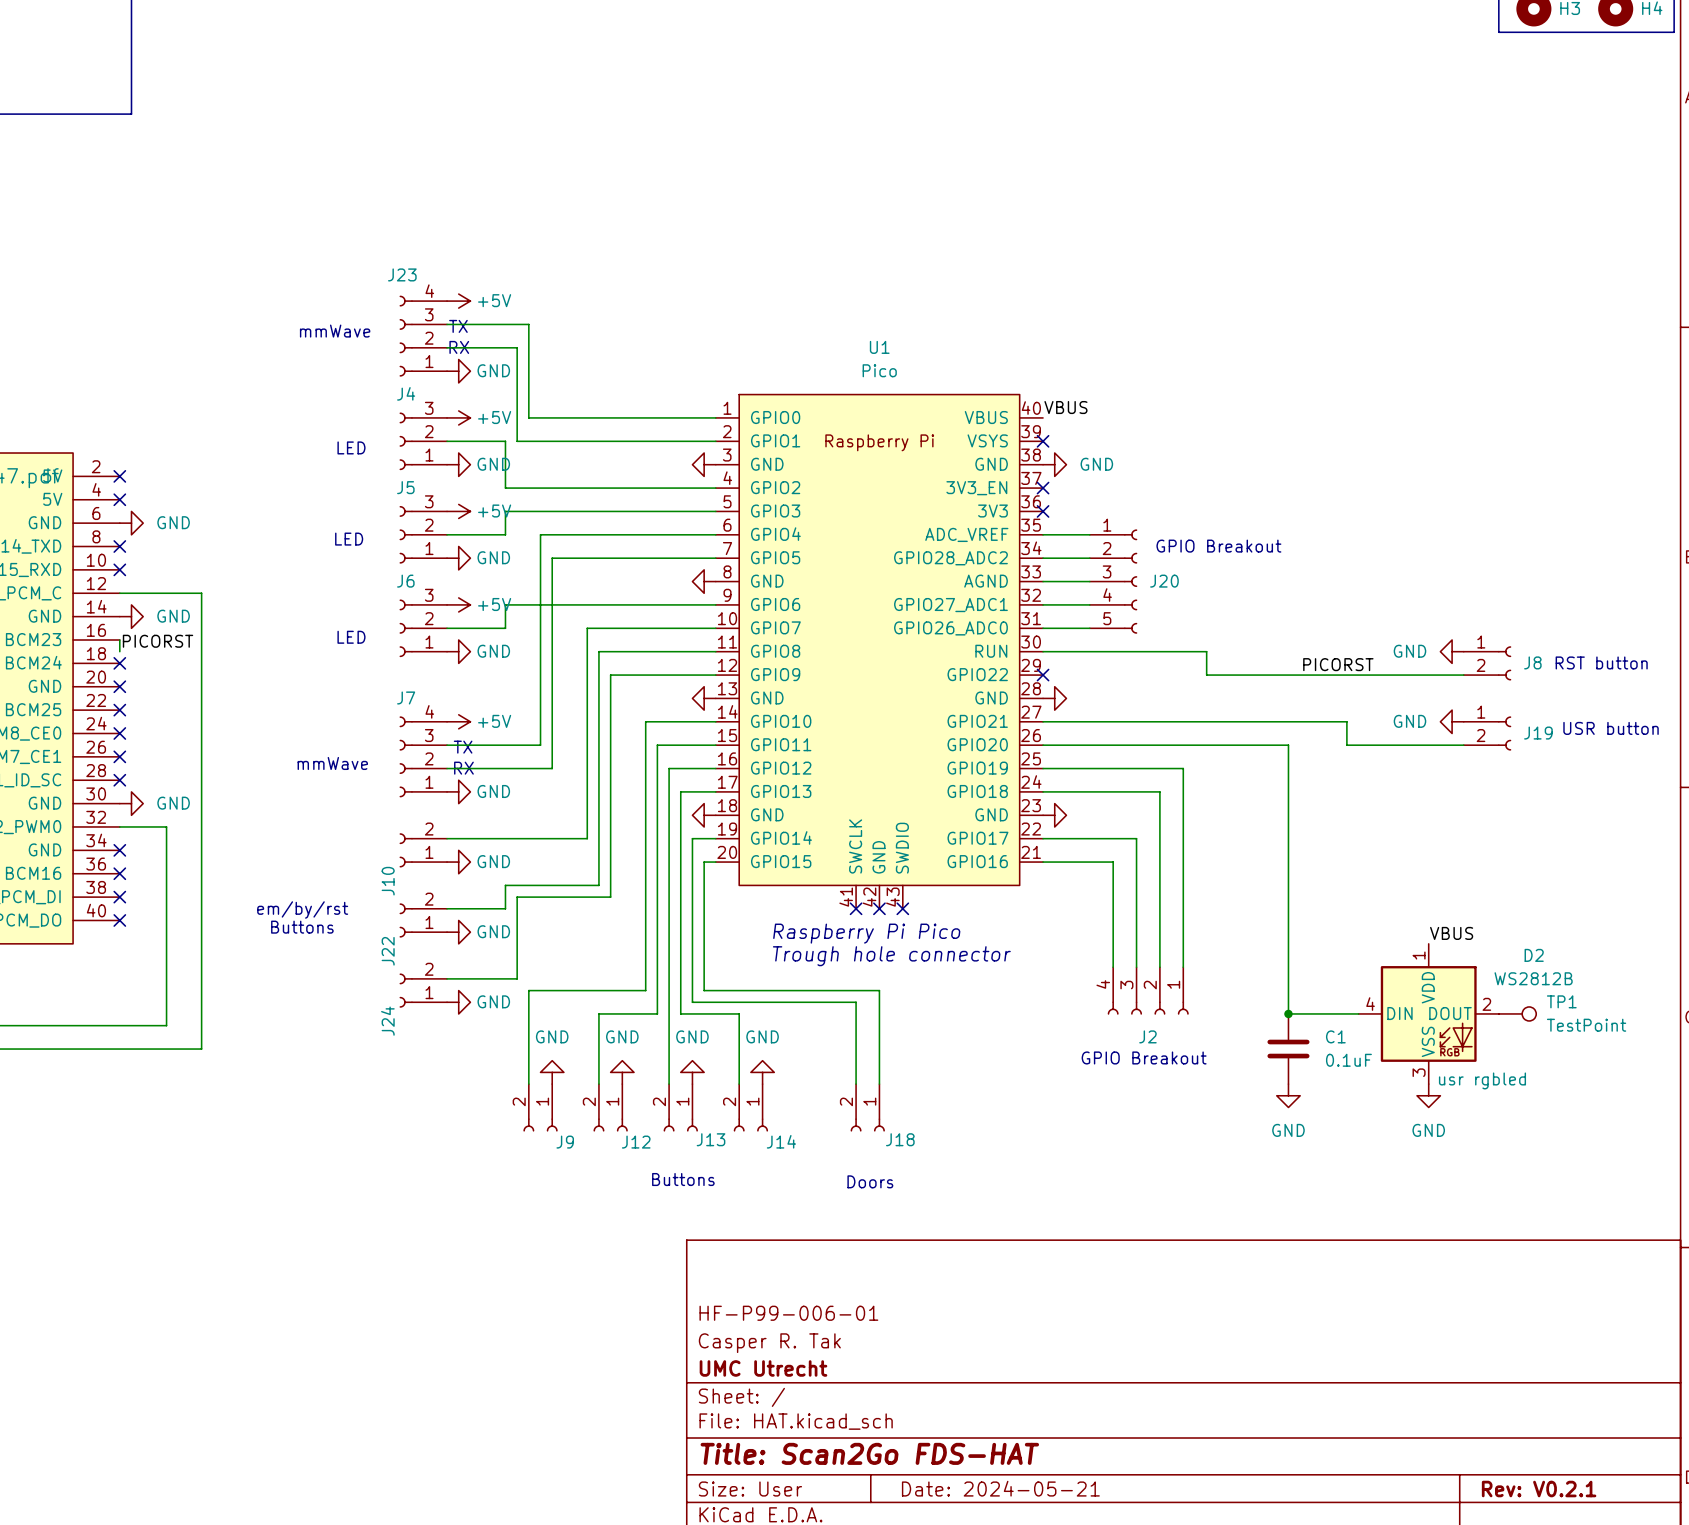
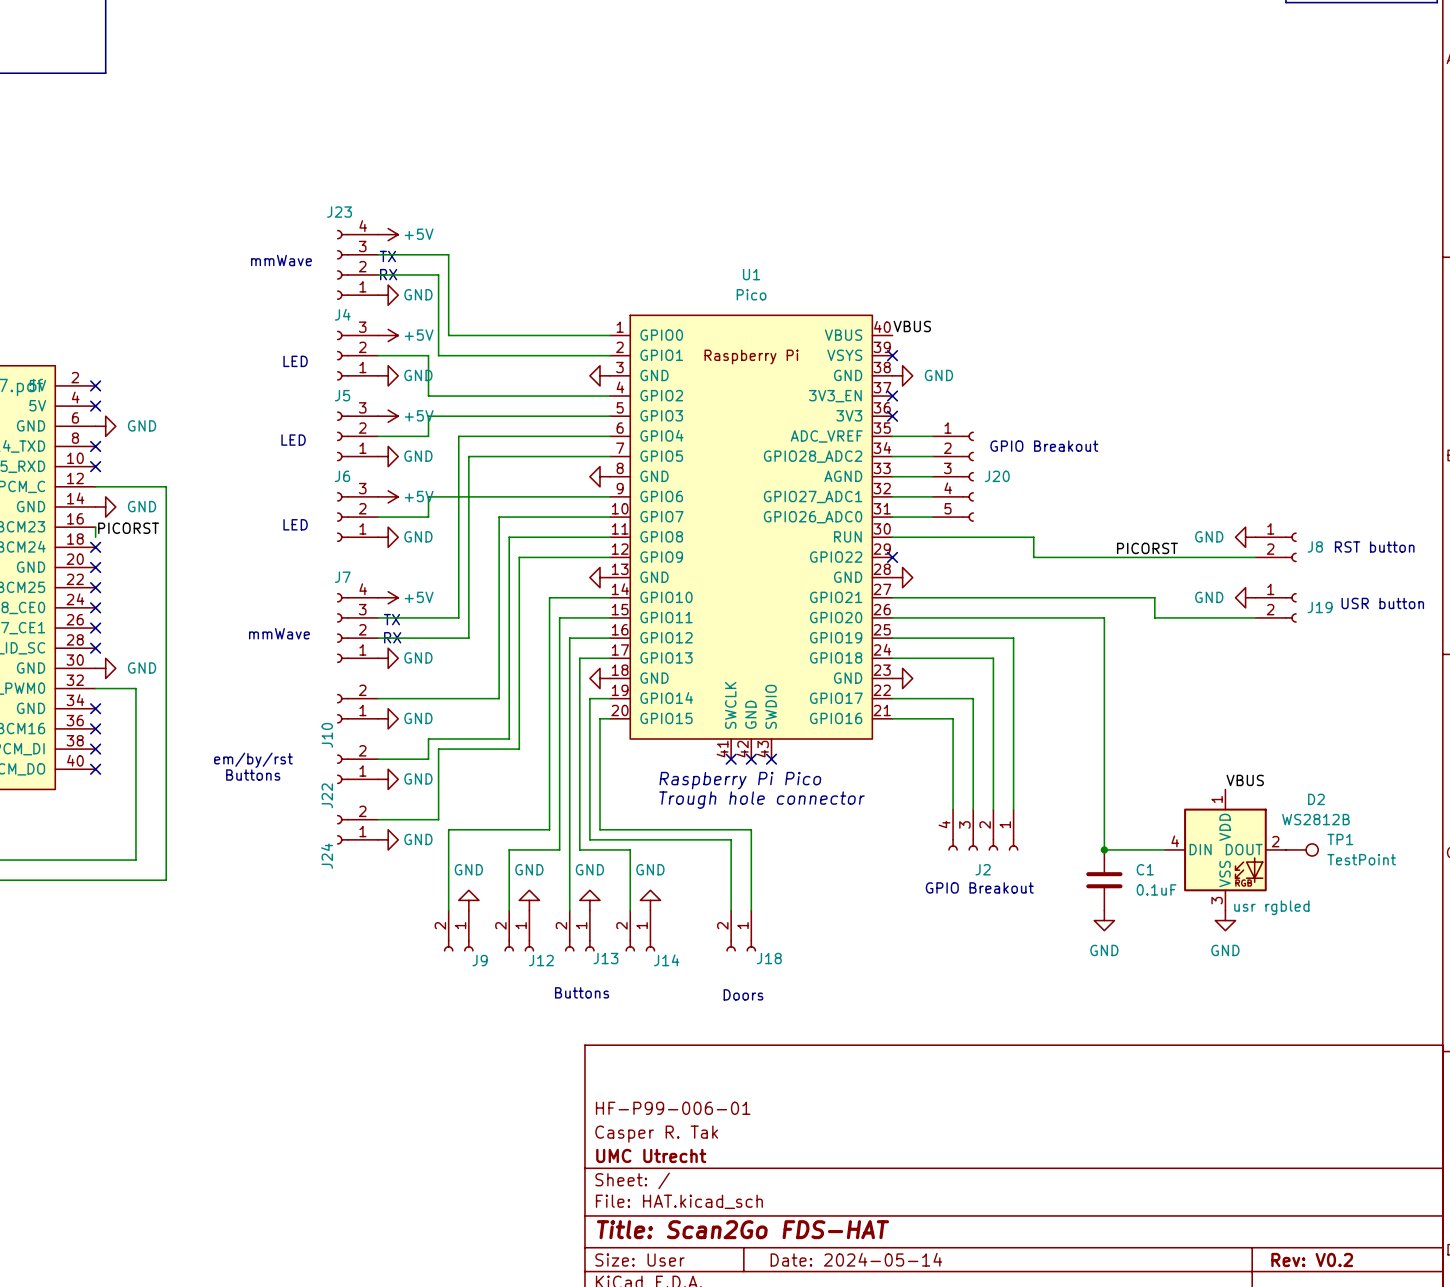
title block: Date: 2024-05-21 (1000, 1488) -> Date: 2024-05-14 (856, 1259)
title block: Rev: V0.2.1 (1539, 1489) -> Rev: V0.2 (1312, 1260)

